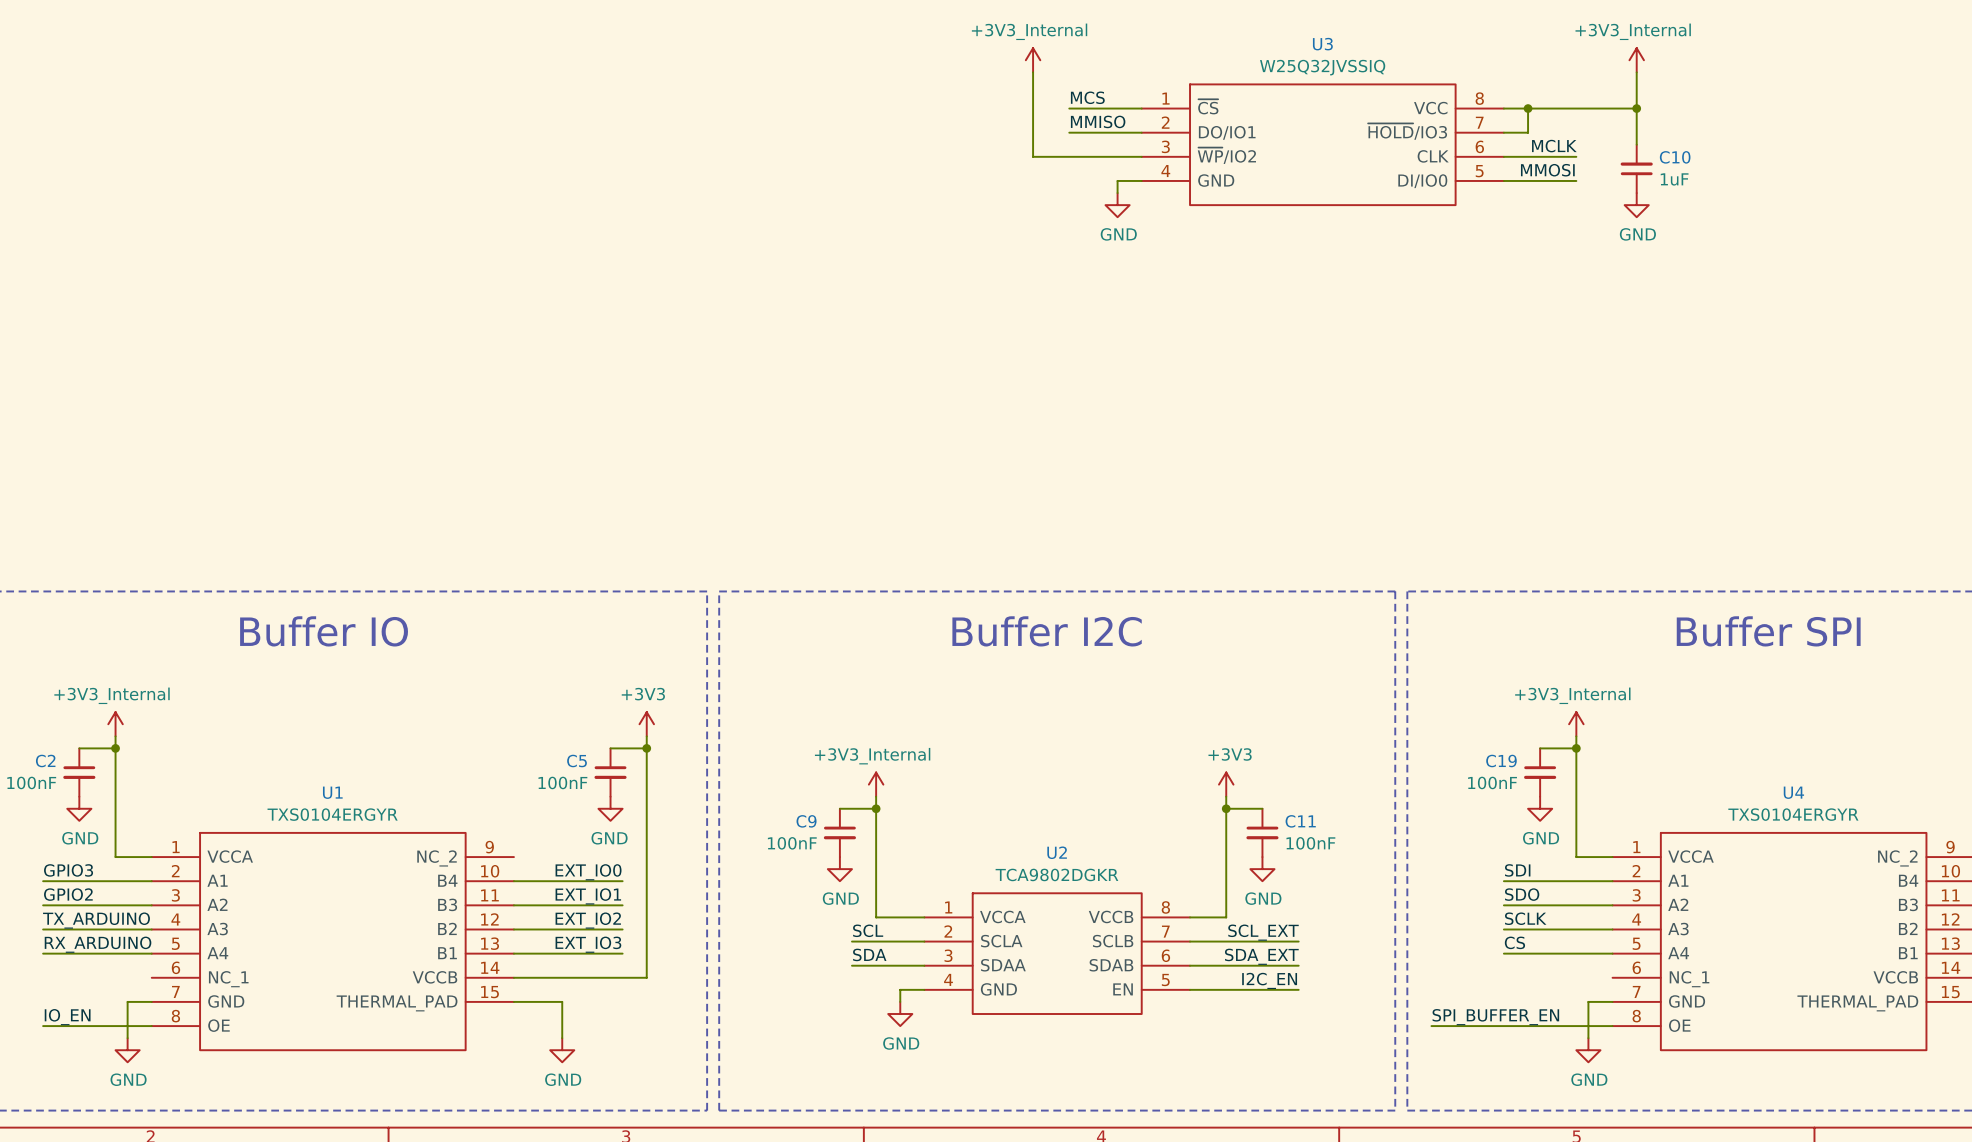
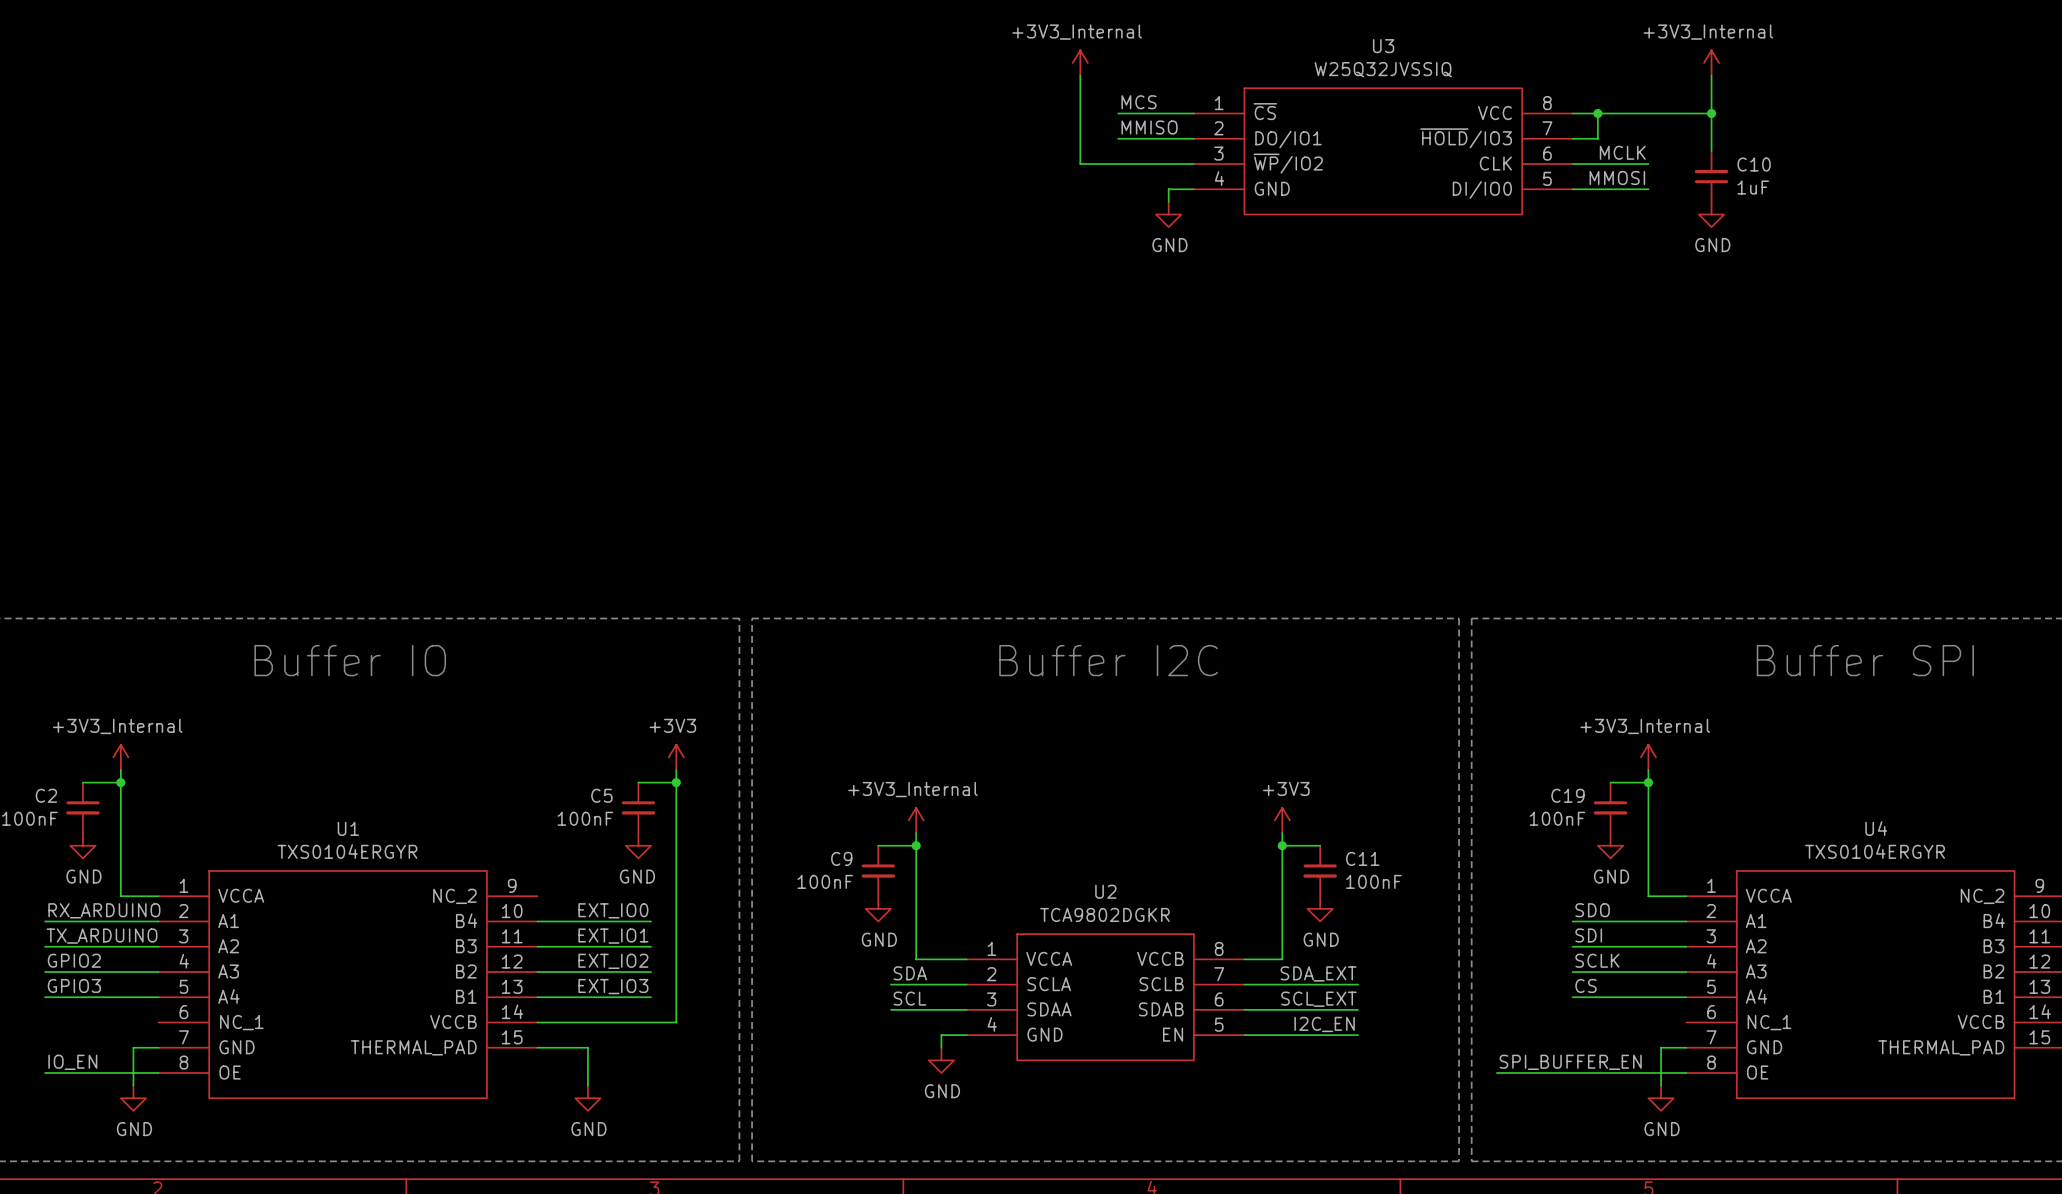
label: GPIO3 (68, 870) -> RX_ARDUINO (104, 910)
label: SDI (1517, 870) -> SDO (1592, 910)
label: GPIO2 (68, 894) -> TX_ARDUINO (101, 936)
label: SDO (1522, 894) -> SDI (1588, 935)
label: TX_ARDUINO (96, 920) -> GPIO2 (74, 960)
label: SCL (868, 930) -> SDA (910, 973)
label: SCL_EXT (1263, 932) -> SDA_EXT (1318, 973)
label: RX_ARDUINO (98, 944) -> GPIO3 (74, 985)
label: SDA (869, 954) -> SCL (909, 998)
label: SDA_EXT (1261, 956) -> SCL_EXT (1318, 999)

